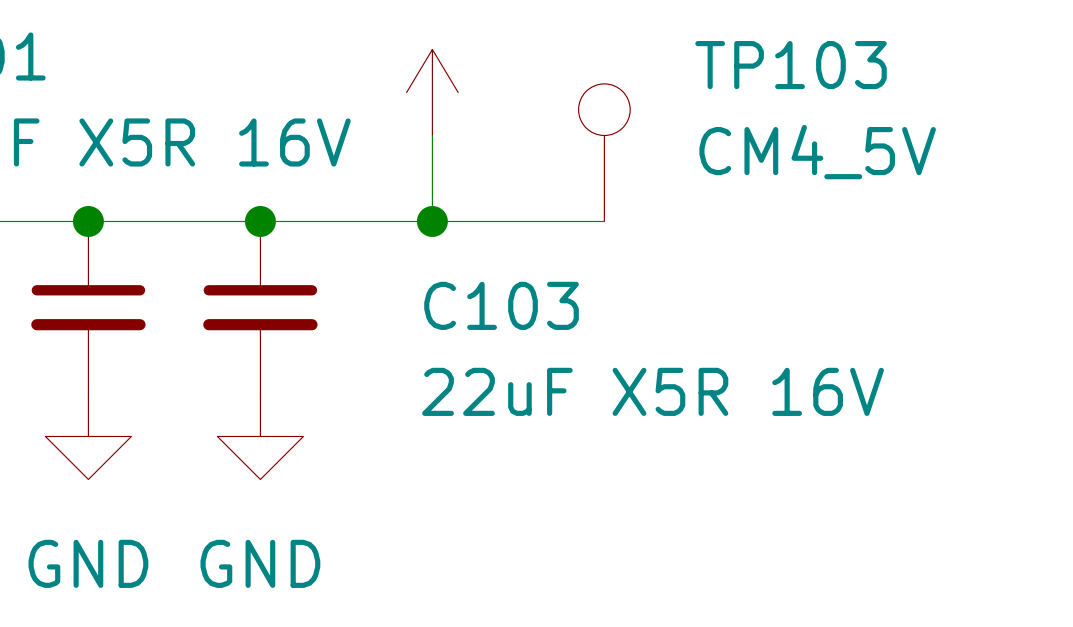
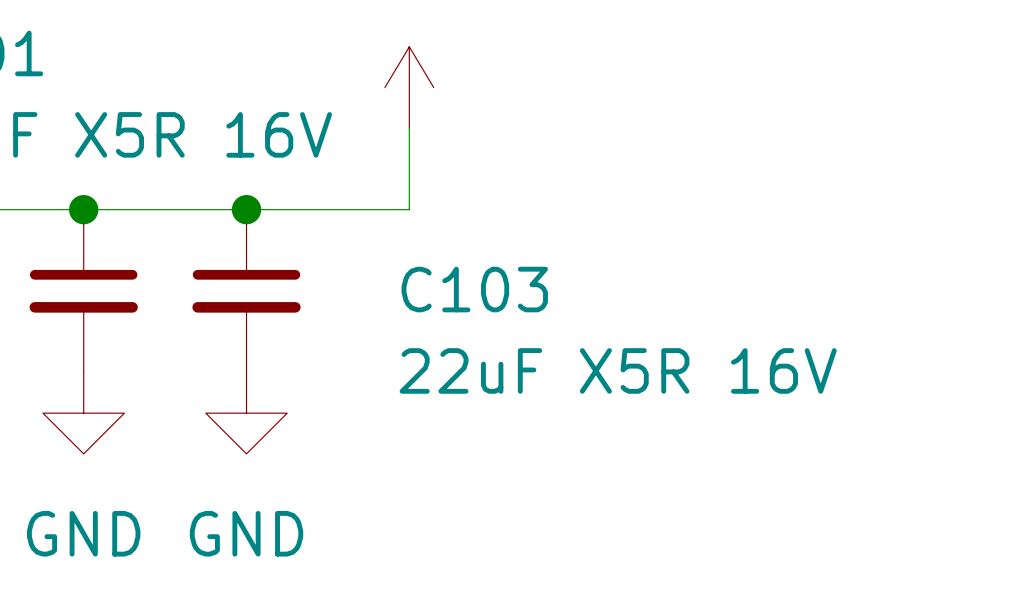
TP103: CM4_5V (604, 152) -> none
wire: (432, 221) (604, 221) -> none
junction: (432, 221) -> none

